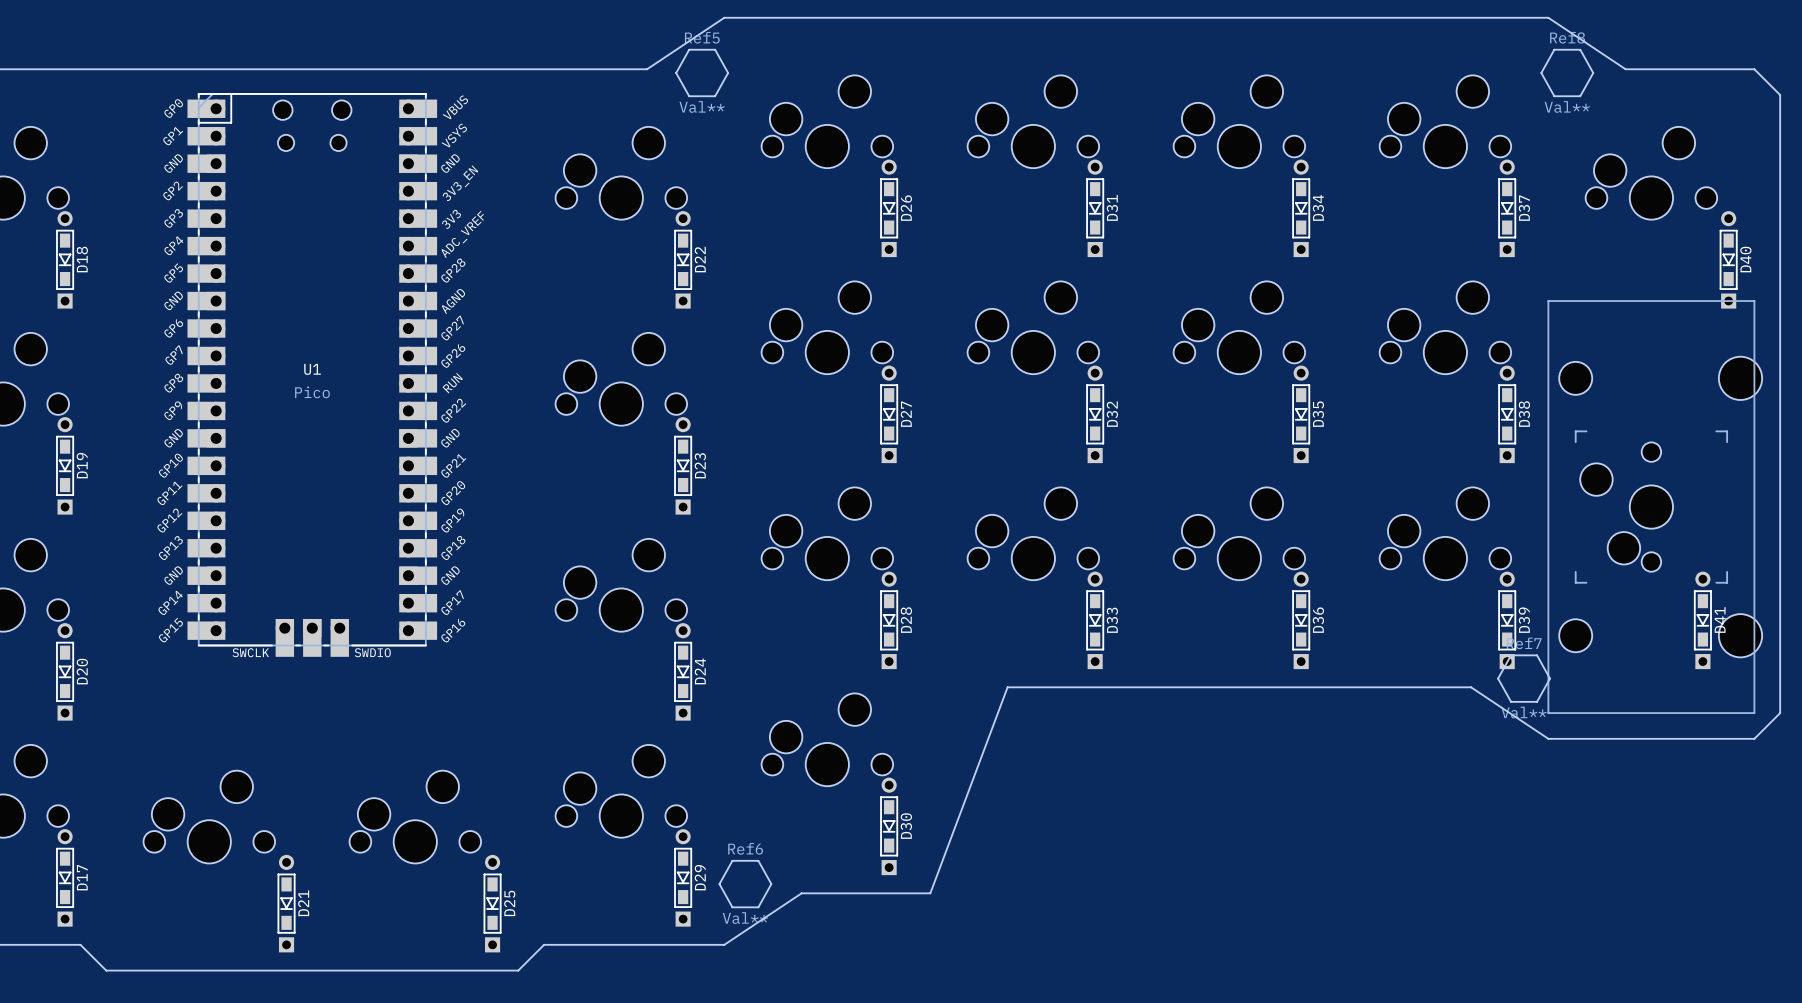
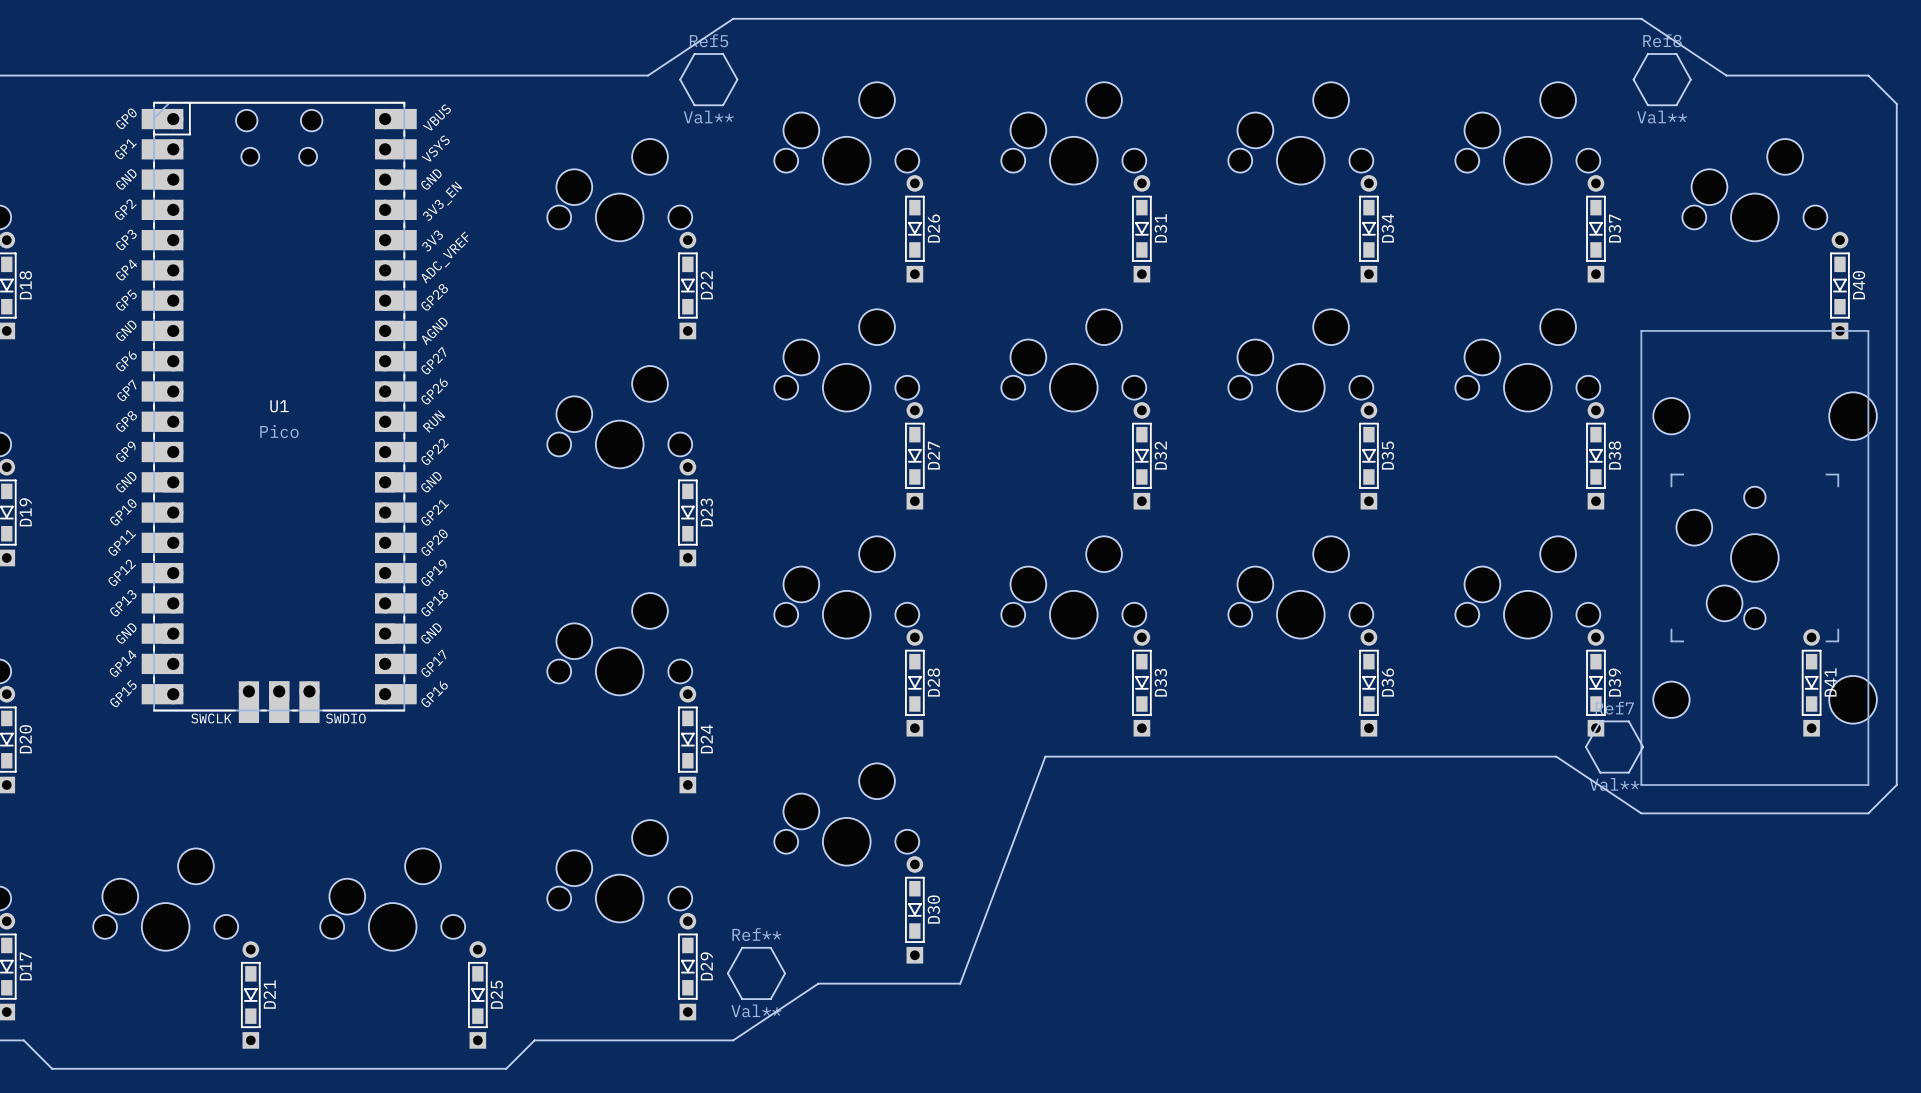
Ref6 name: Ref6 (745, 848) -> Ref** (756, 934)

